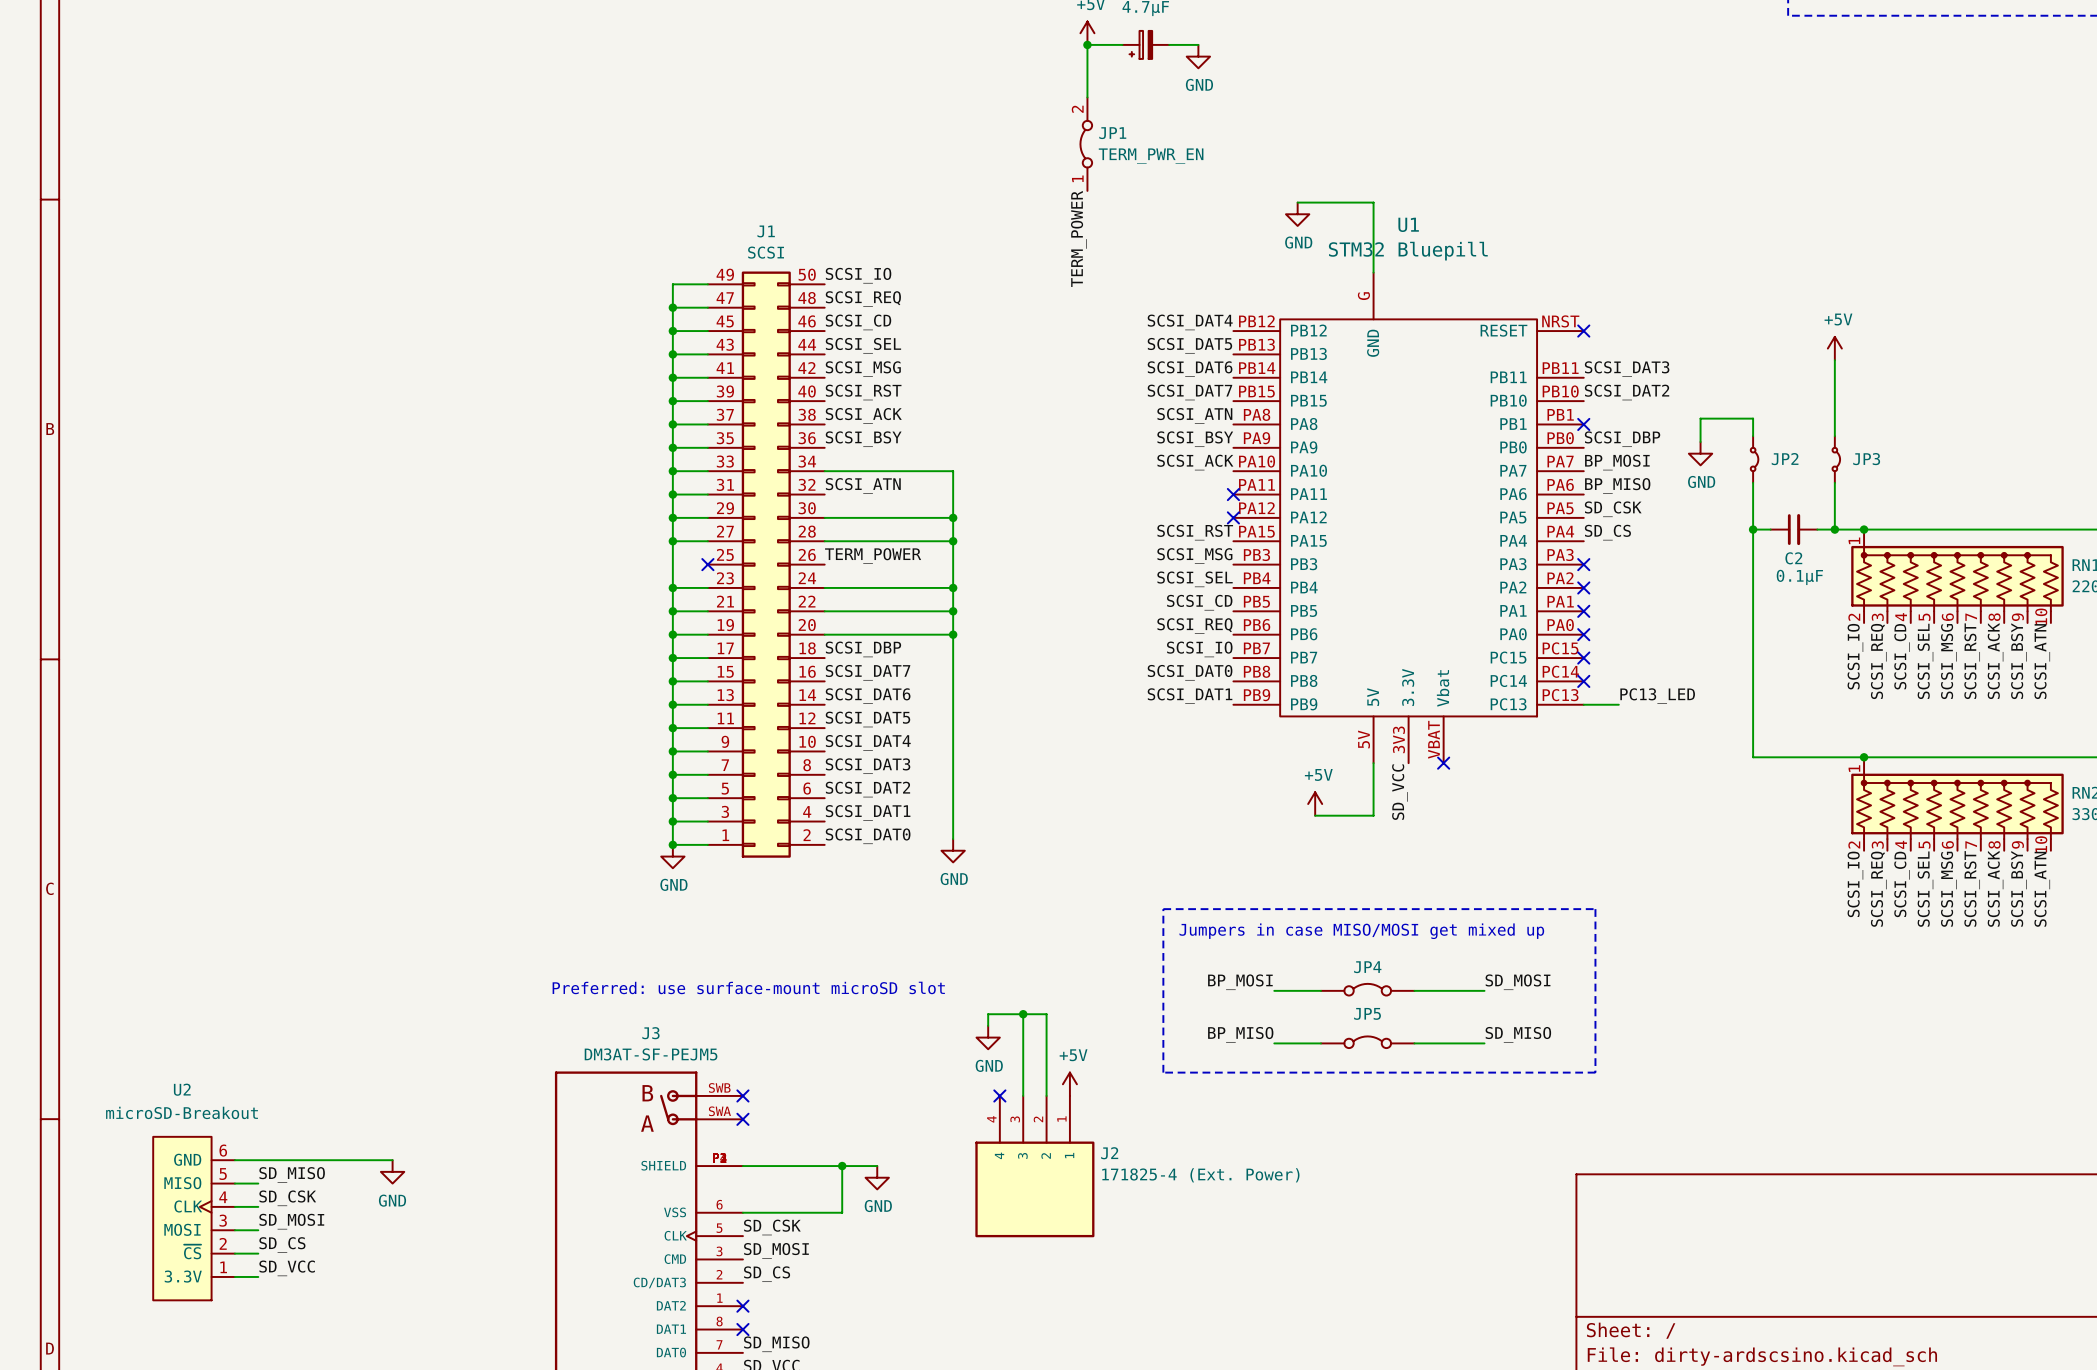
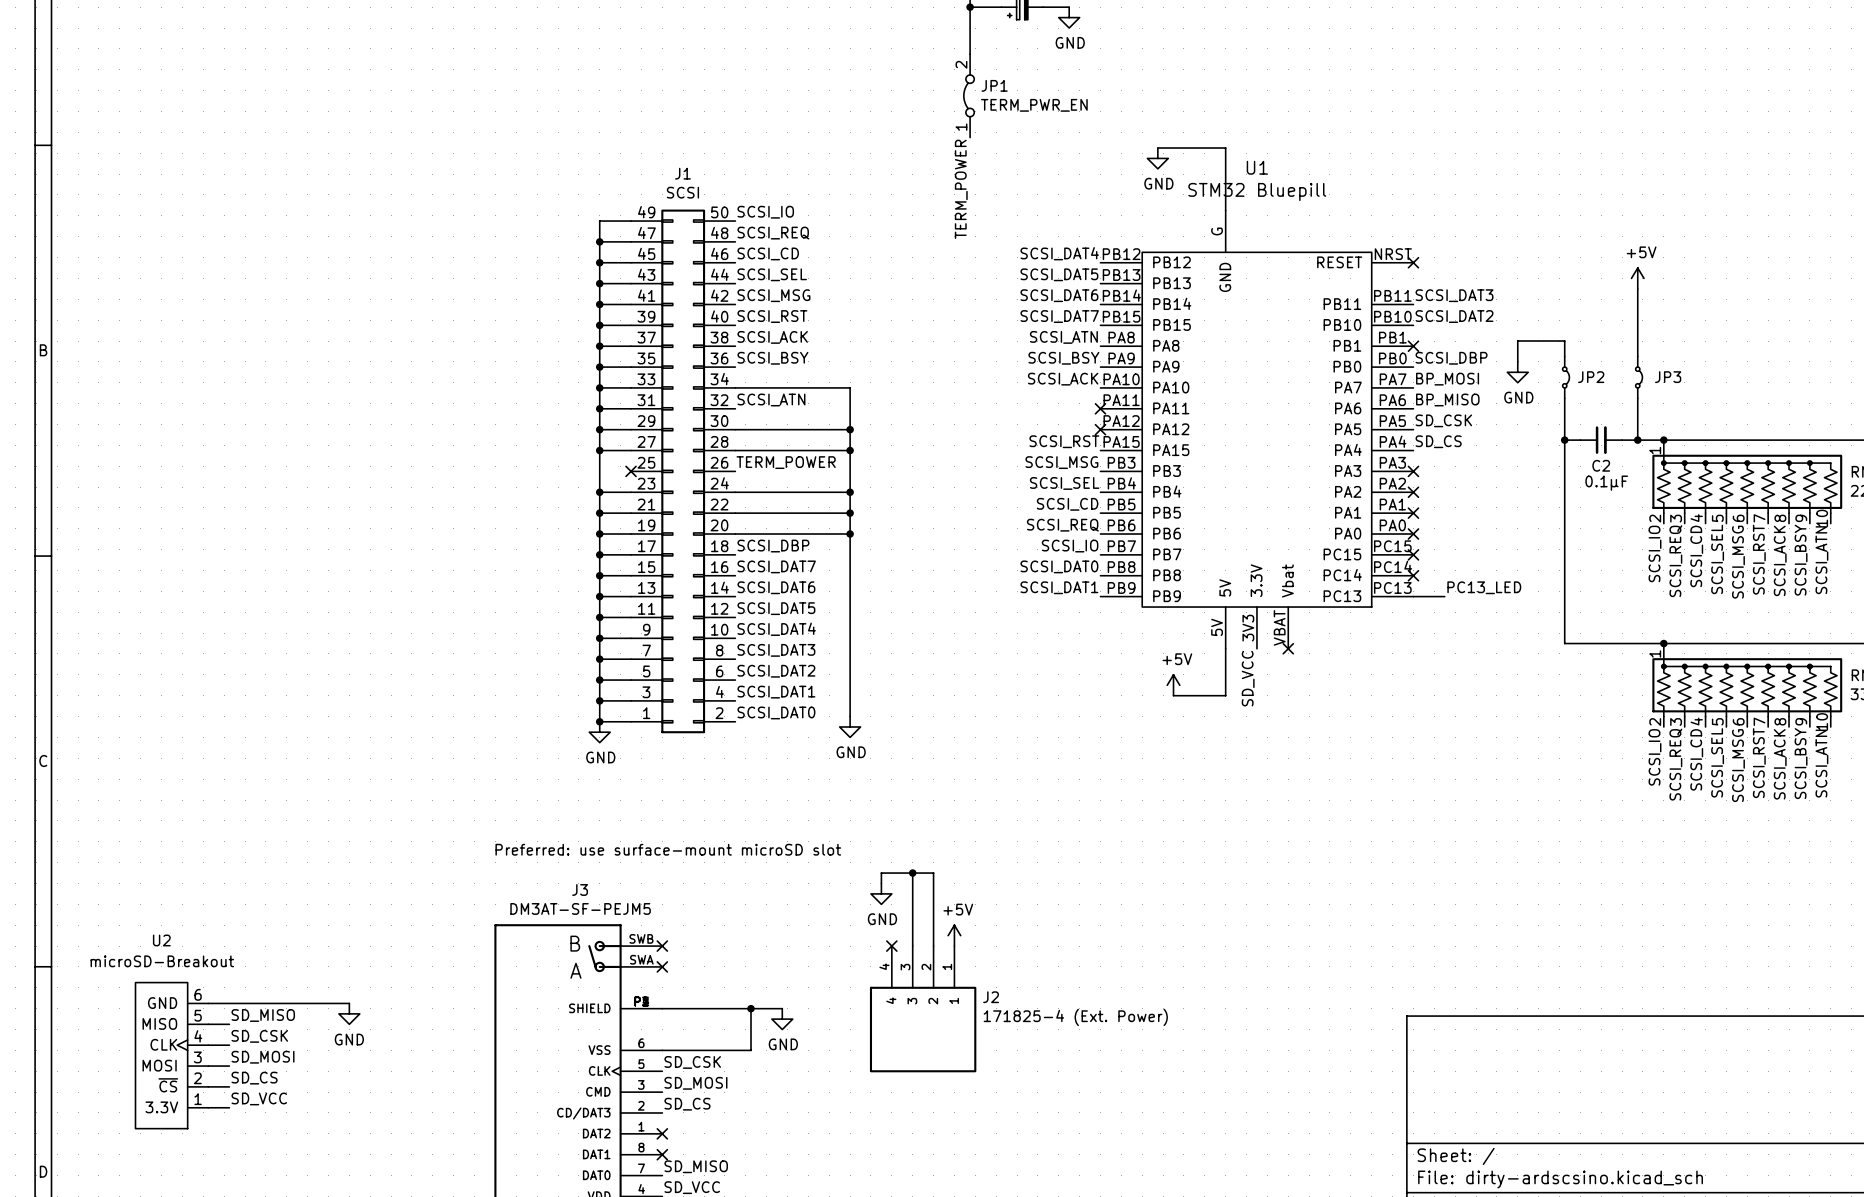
line: (1163, 909) (1595, 909) (1595, 1072) (1163, 1072) (1163, 909) -> none
text: Jumpers in case MISO/MOSI get mixed up (1361, 931) -> none
label: BP_MOSI (1240, 982) -> none
label: SD_MOSI (1518, 982) -> none
JP4: (1367, 989) -> none
wire: (1274, 990) (1321, 990) -> none
wire: (1414, 990) (1484, 990) -> none
label: BP_MISO (1240, 1034) -> none
label: SD_MISO (1518, 1034) -> none
JP5: (1367, 1042) -> none
wire: (1274, 1043) (1321, 1043) -> none
wire: (1414, 1043) (1484, 1043) -> none

